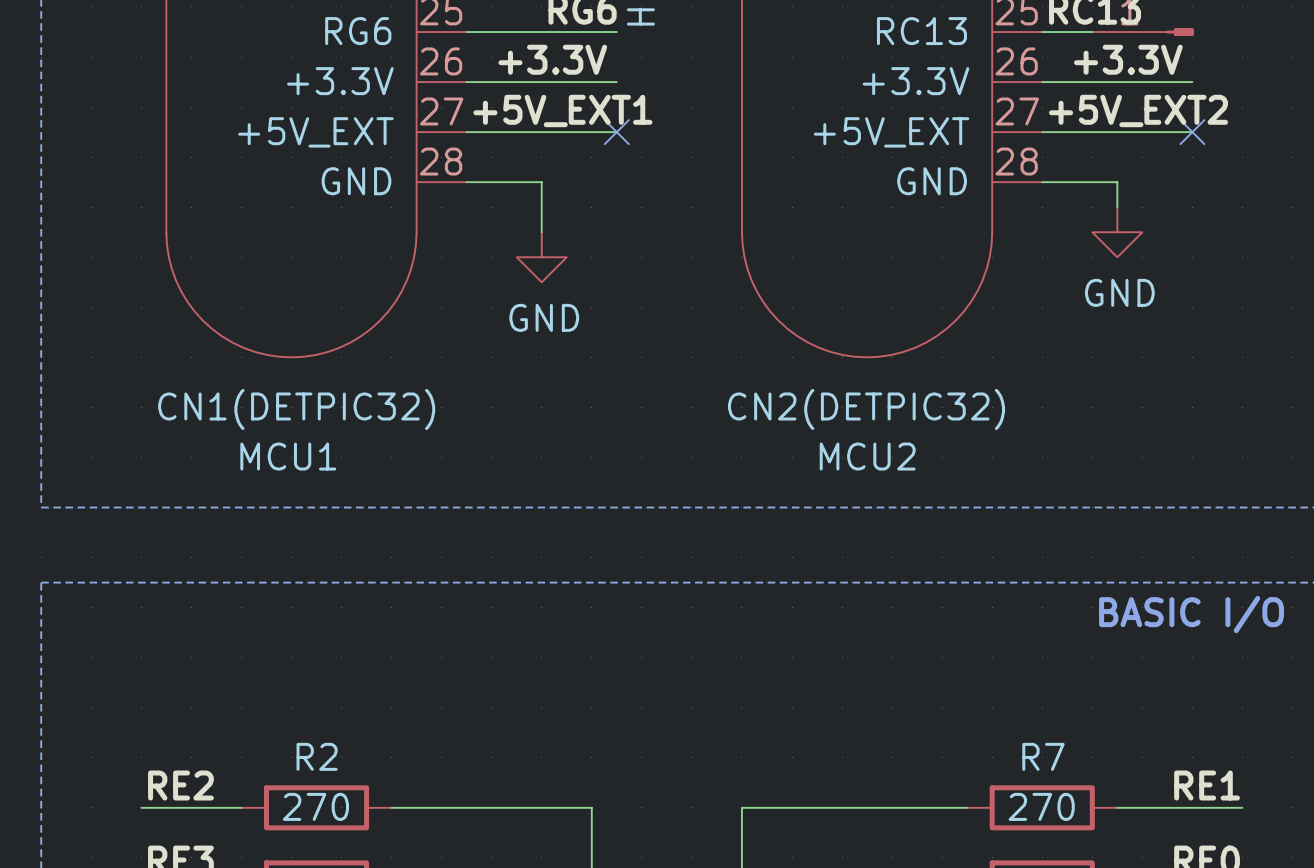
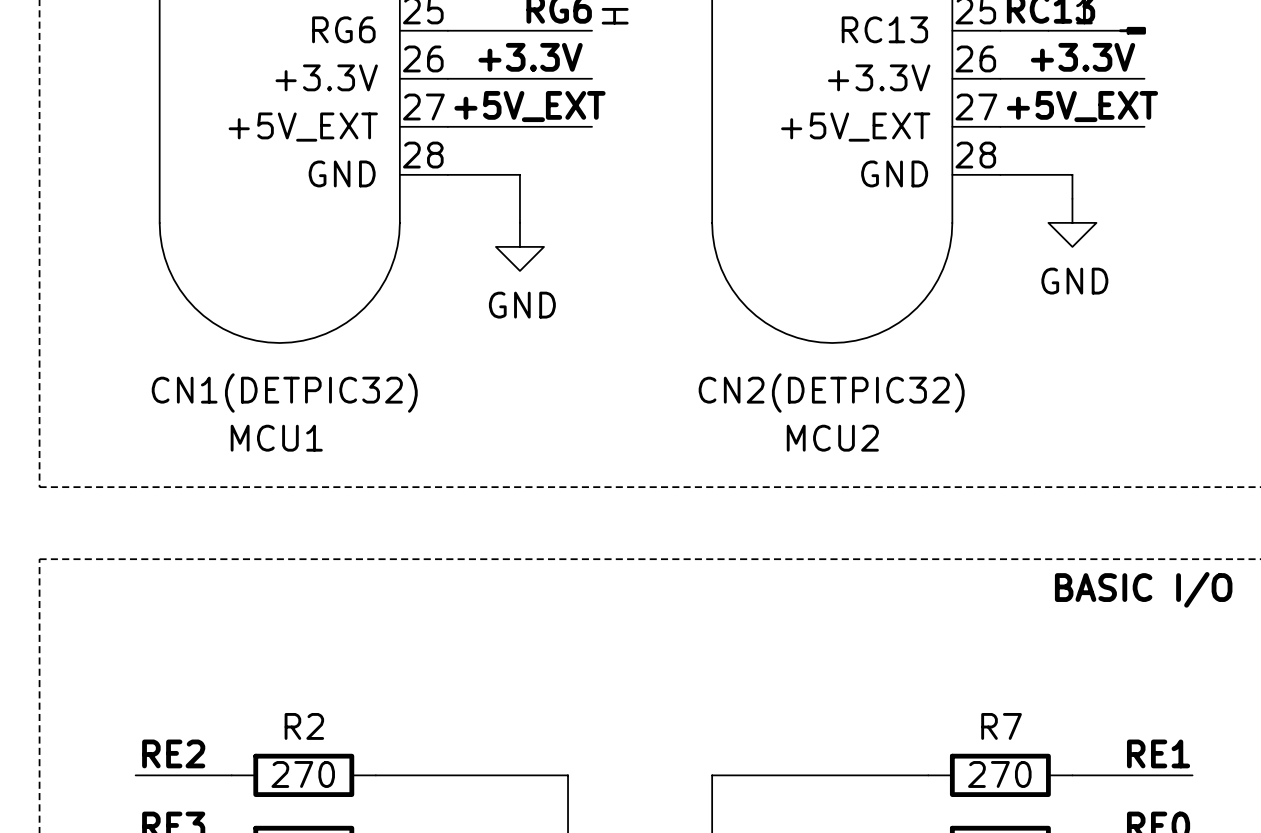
label: +5V_EXT1 (562, 110) -> +5V_EXT (530, 106)
label: +5V_EXT2 (1138, 110) -> +5V_EXT (1082, 106)
no-connect mark: (616, 132) -> none
no-connect mark: (1192, 132) -> none

